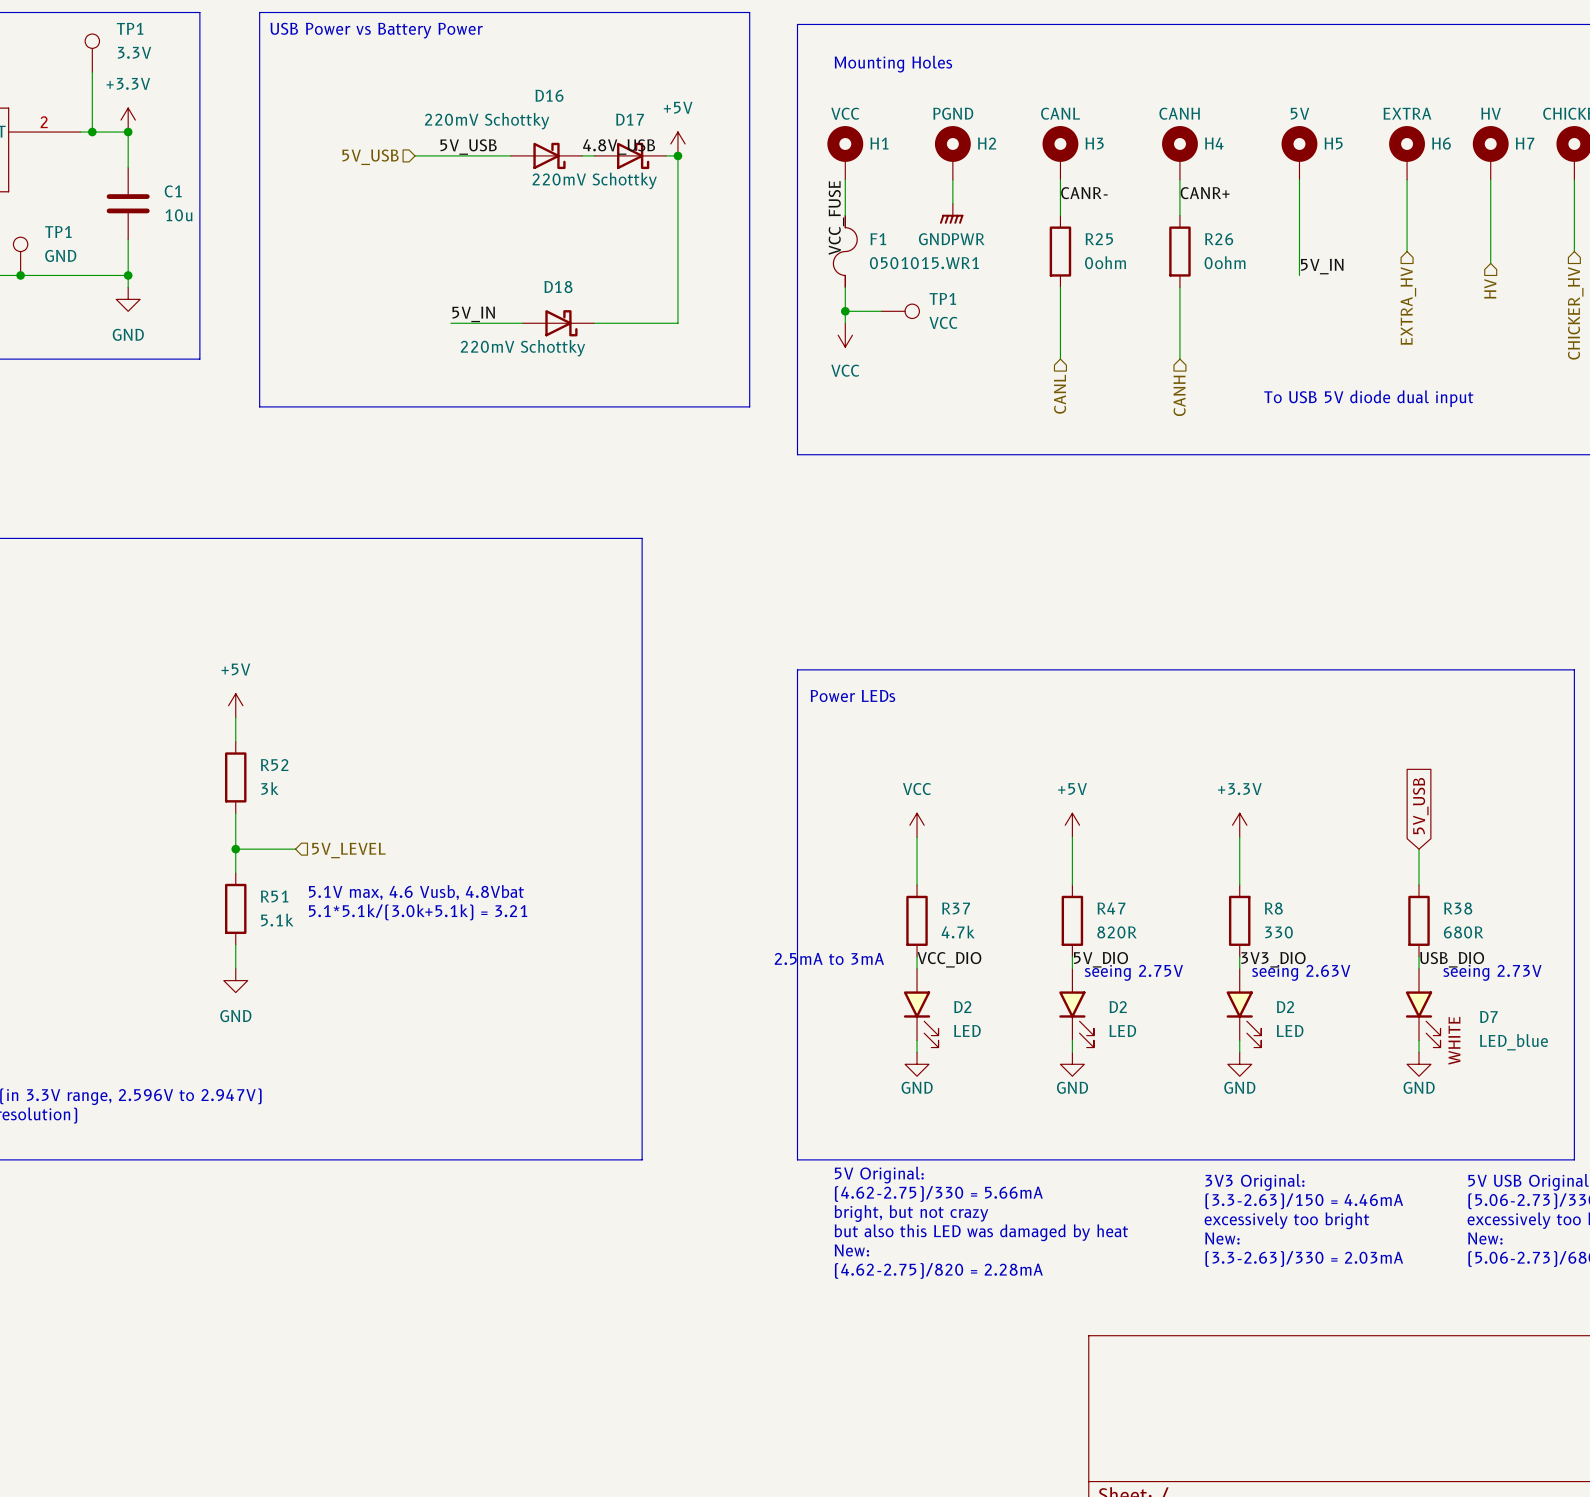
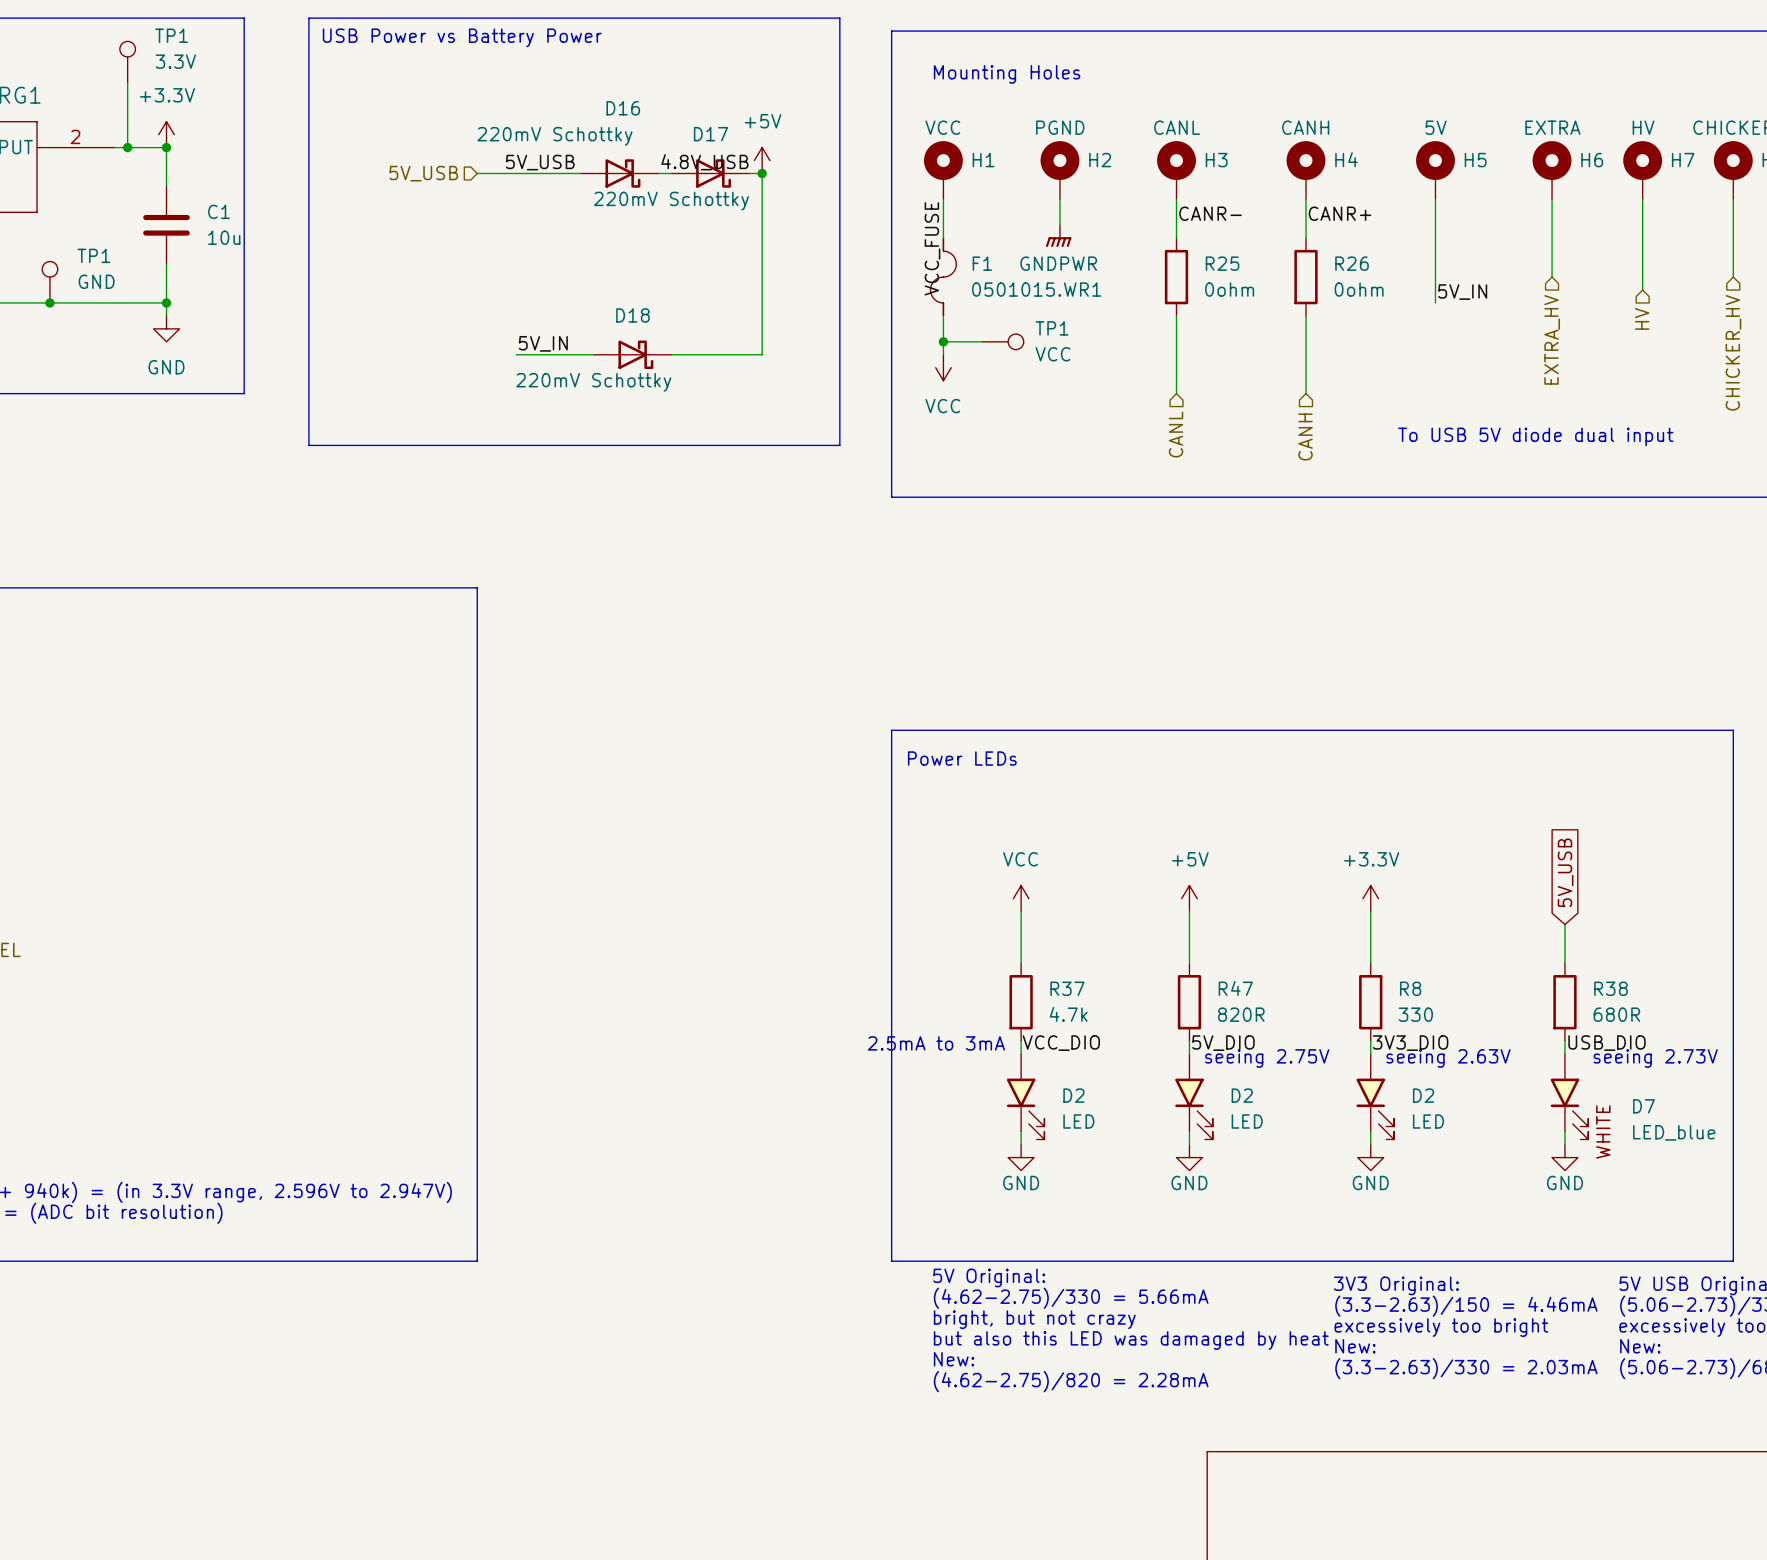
line: (415, 538) (642, 538) (642, 1159) (415, 1159) -> (477, 587) (477, 1261)
power symbol: +5V (235, 705) -> none
wire: (235, 717) (235, 741) -> none
R52: 3k (235, 777) -> none
wire: (235, 813) (235, 873) -> none
wire: (235, 849) (295, 849) -> none
junction: (235, 849) -> none
hierarchical label: 5V_LEVEL (348, 850) -> none
text: 5.1V max, 4.6 Vusb, 4.8Vbat (416, 892) -> none
R51: 5.1k (235, 908) -> none
text: 5.1*5.1k/(3.0k+5.1k) = 3.21 (418, 912) -> none
wire: (235, 944) (235, 968) -> none
power symbol: GND (235, 980) -> none

